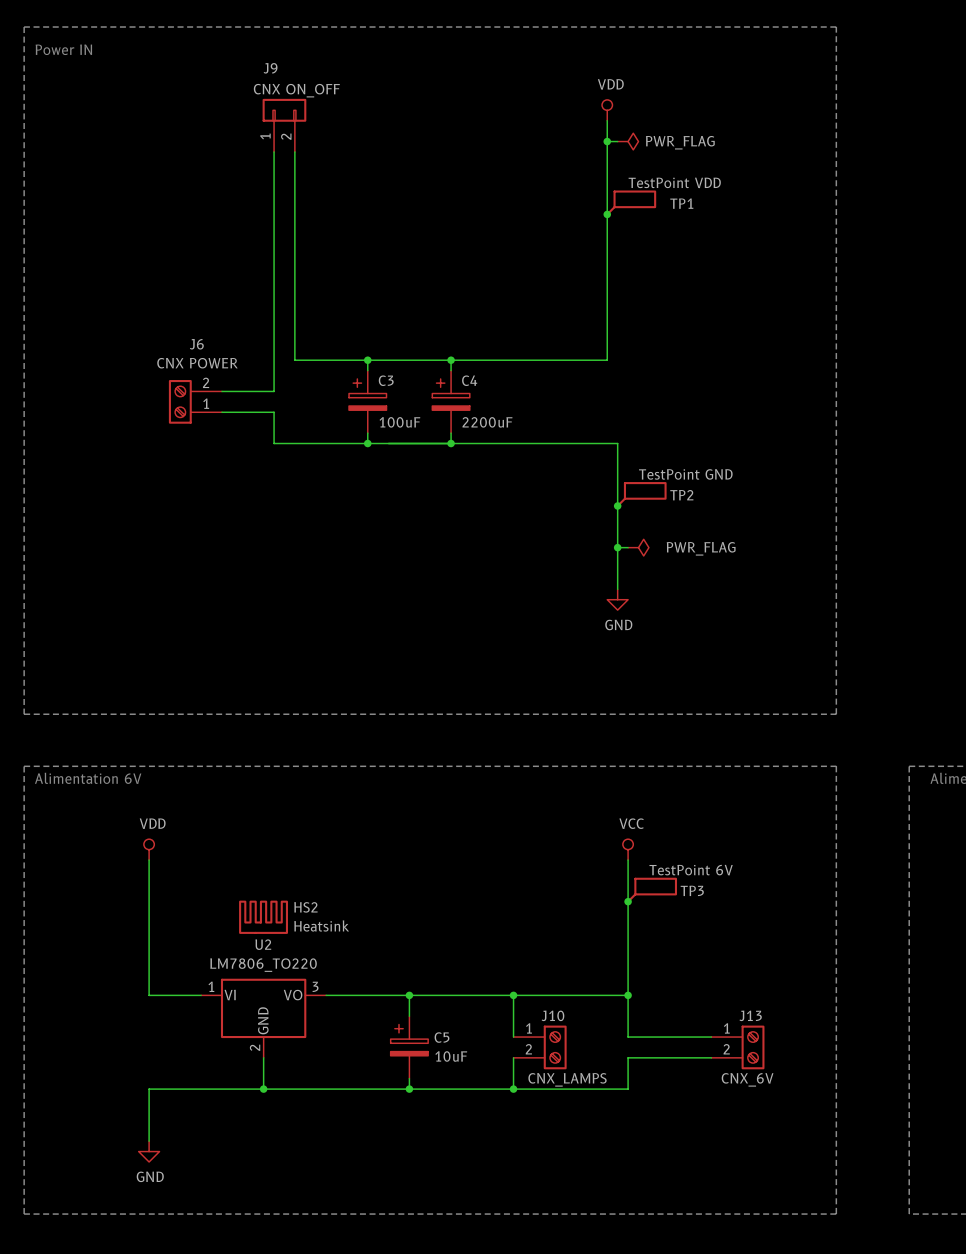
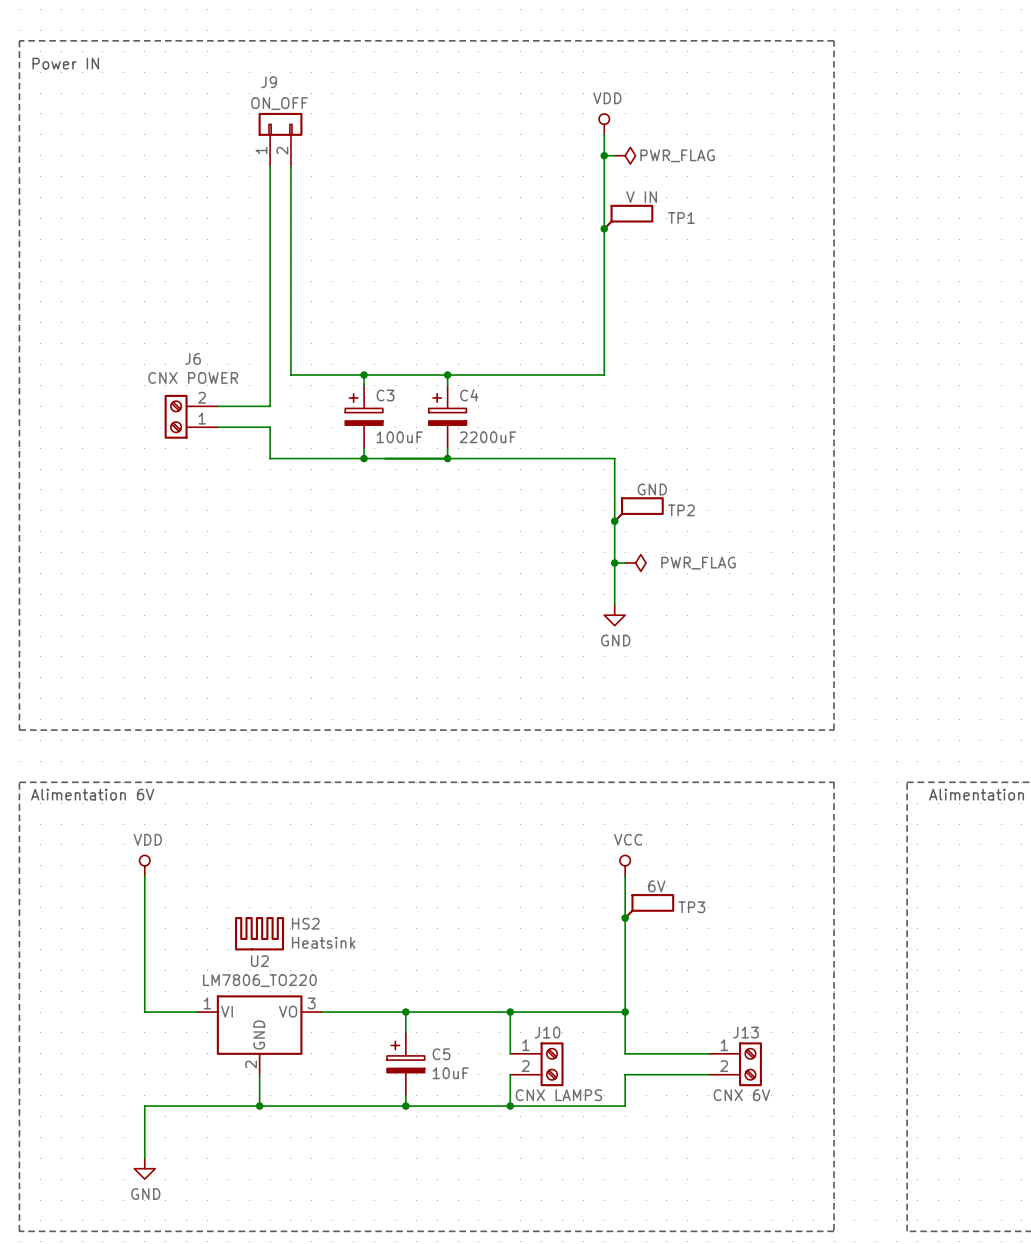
J9 value: CNX ON_OFF (296, 90) -> ON_OFF (279, 103)
TP1 value: TestPoint VDD (674, 182) -> V IN (641, 197)
TP2 value: TestPoint GND (685, 474) -> GND (652, 489)
TP3 value: TestPoint 6V (691, 870) -> 6V (656, 886)
J10 value: CNX_LAMPS (567, 1079) -> CNX LAMPS (558, 1095)
J13 value: CNX_6V (747, 1079) -> CNX 6V (741, 1095)

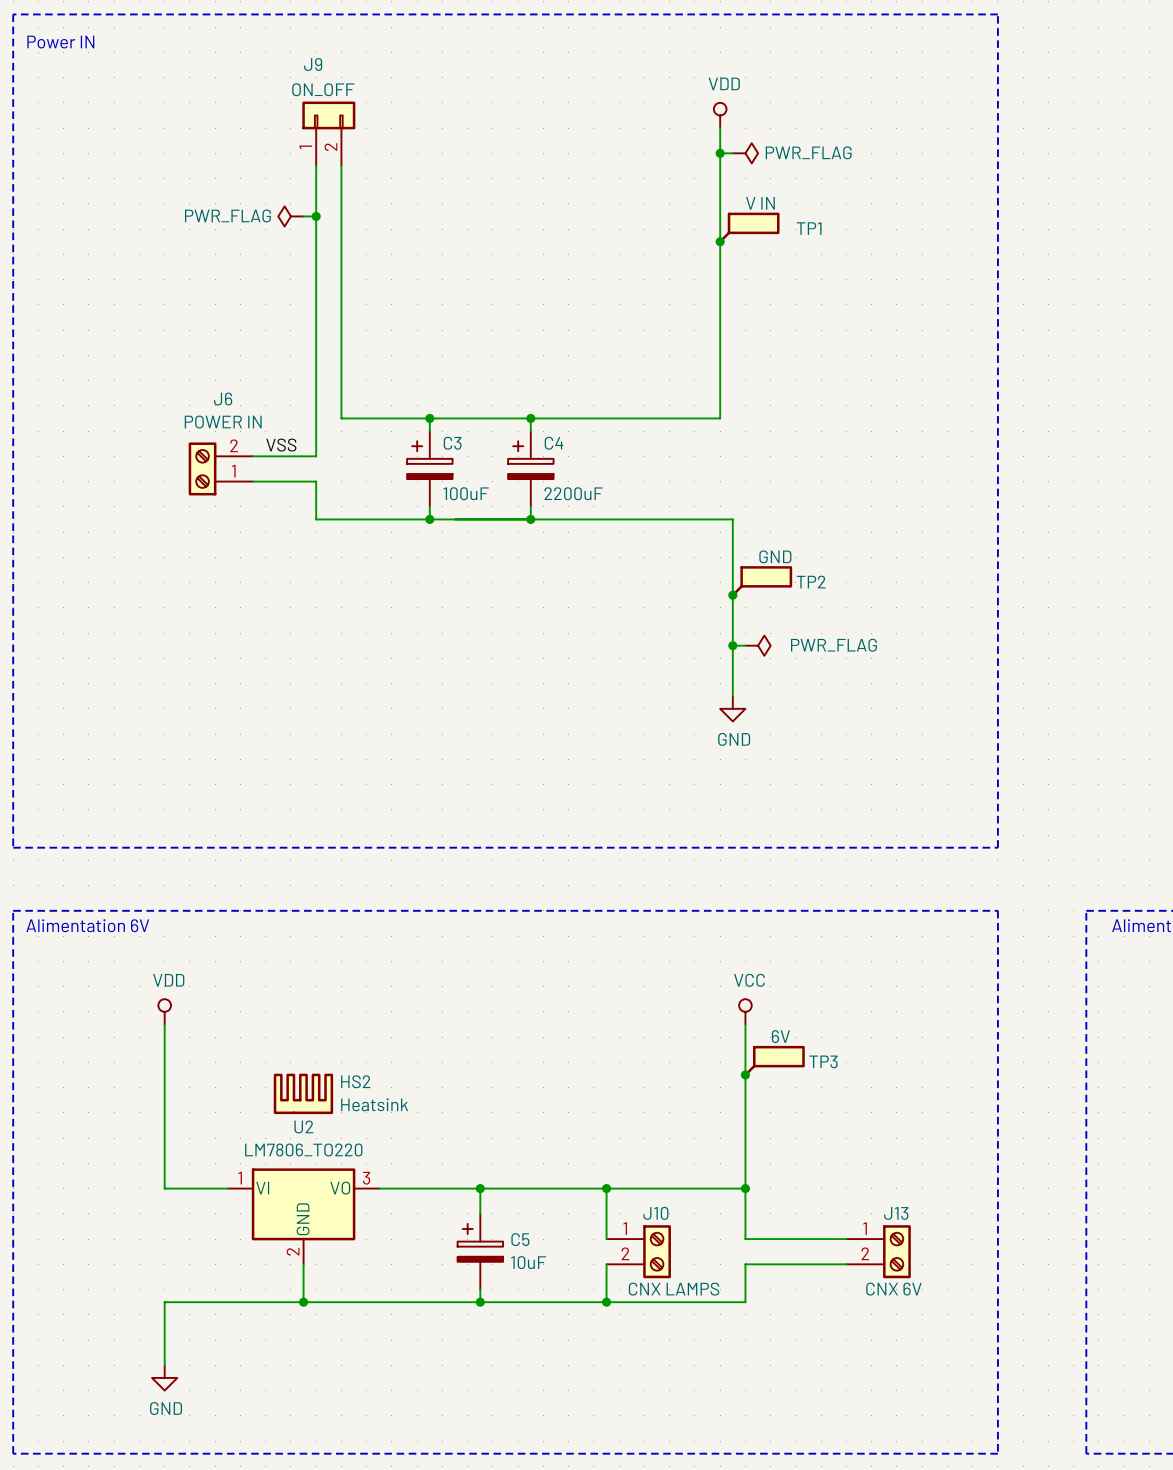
power symbol: none -> PWR_FLAG (290, 216)
wire: none -> (303, 216) (316, 216)
junction: none -> (316, 216)
J6 value: CNX POWER (193, 377) -> POWER IN (223, 422)
label: none -> VSS (281, 445)

